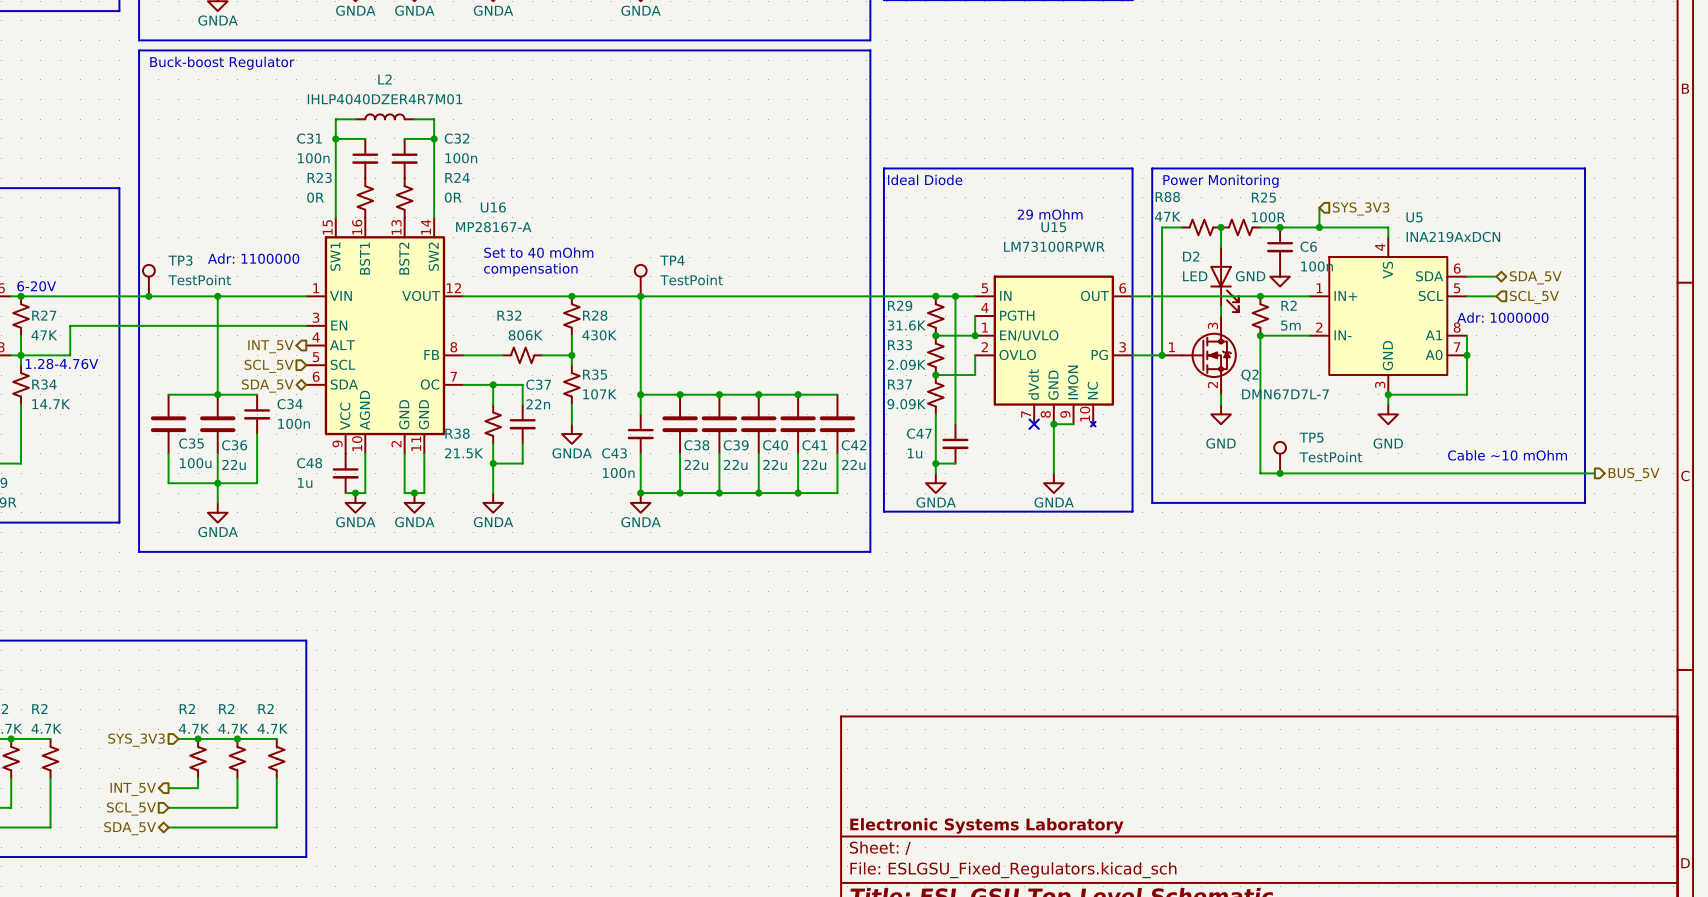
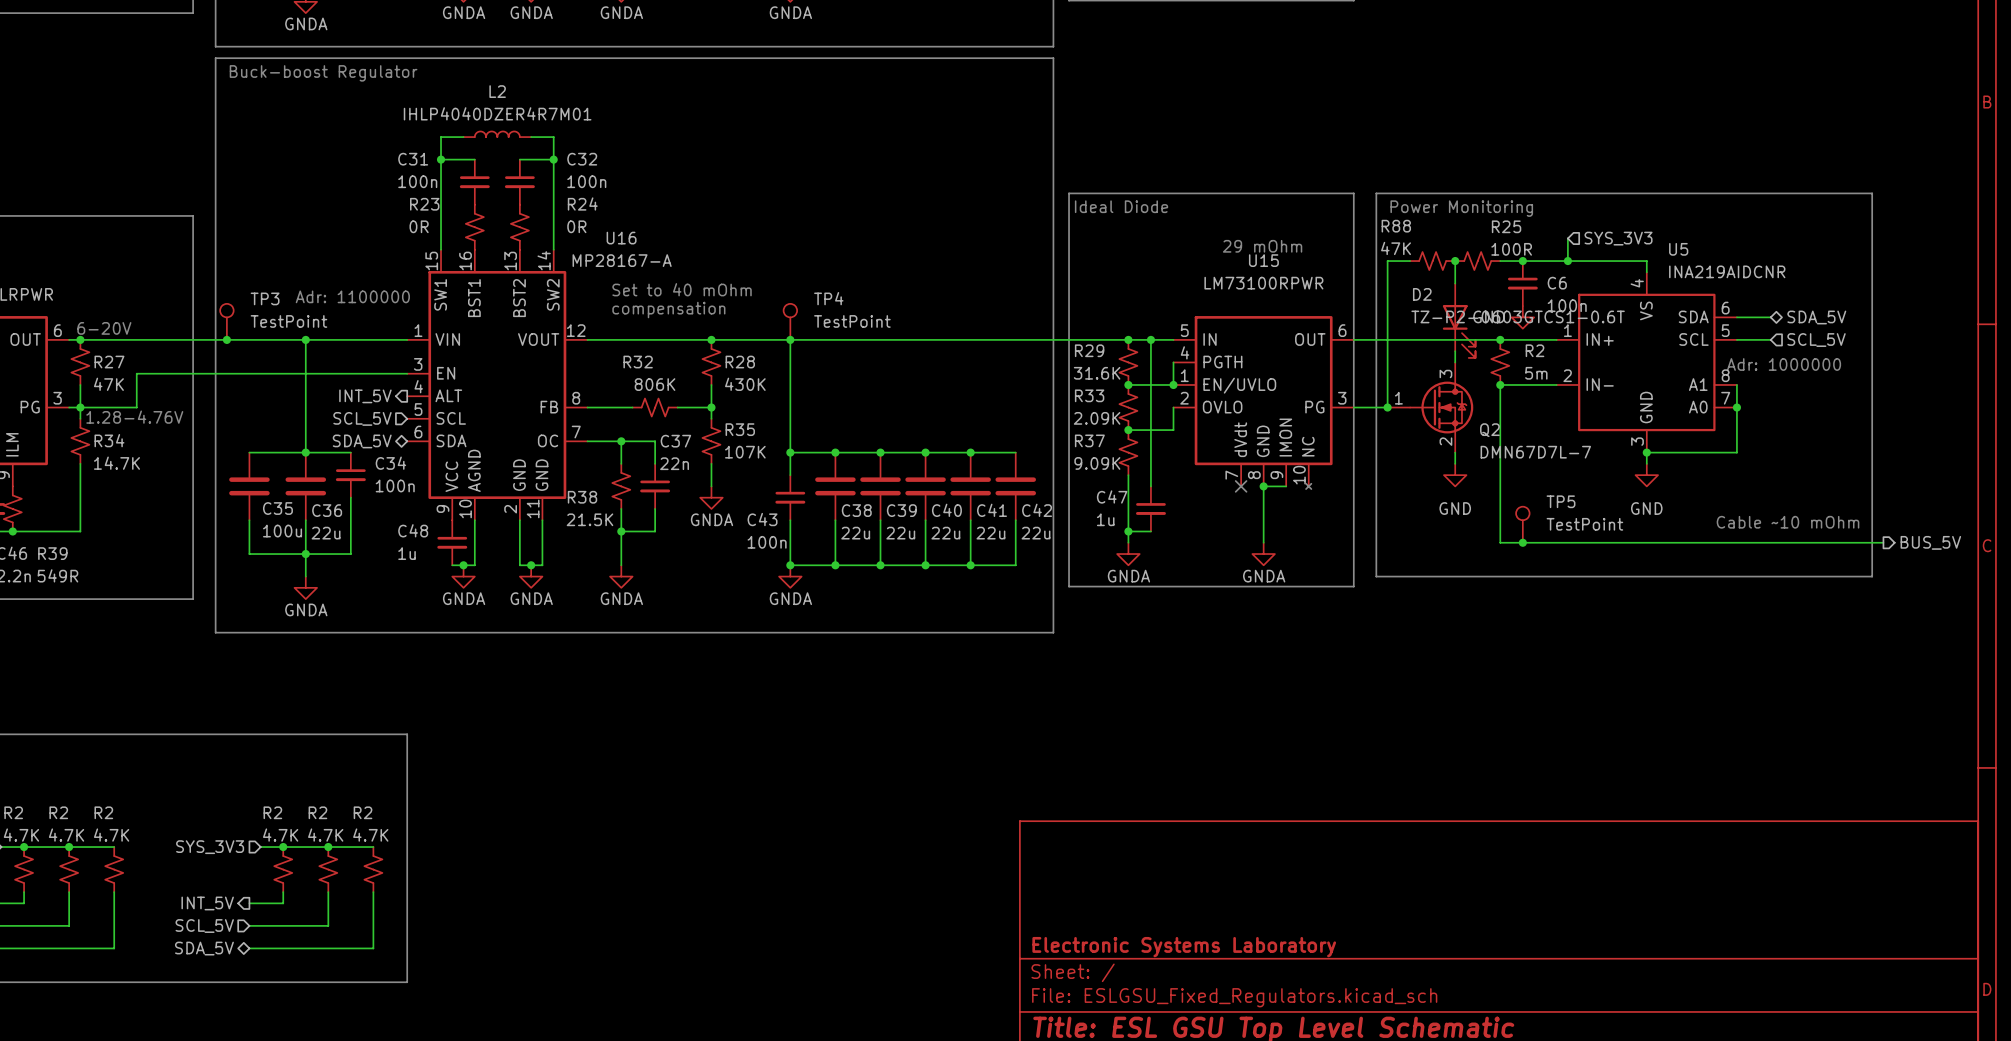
U5 value: INA219AxDCN (1453, 236) -> INA219AIDCNR (1727, 271)
D2 value: LED (1195, 276) -> TZ-P2-0603GTCS1-0.6T (1518, 316)

